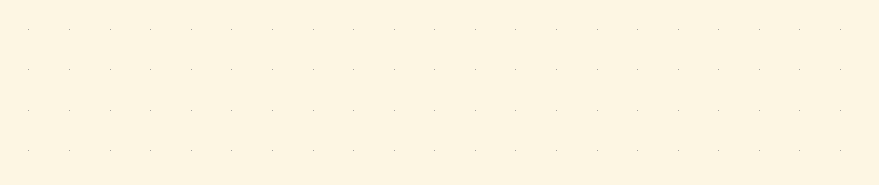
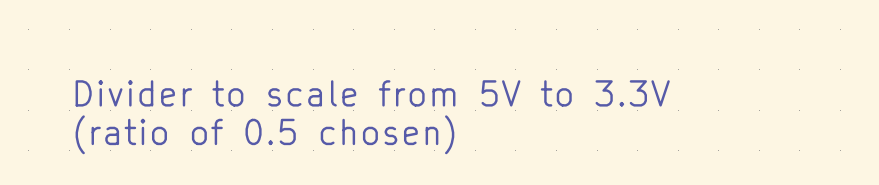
text: none -> Divider to scale from 5V to 3.3V (372, 93)
text: none -> (ratio of 0.5 chosen) (264, 134)

